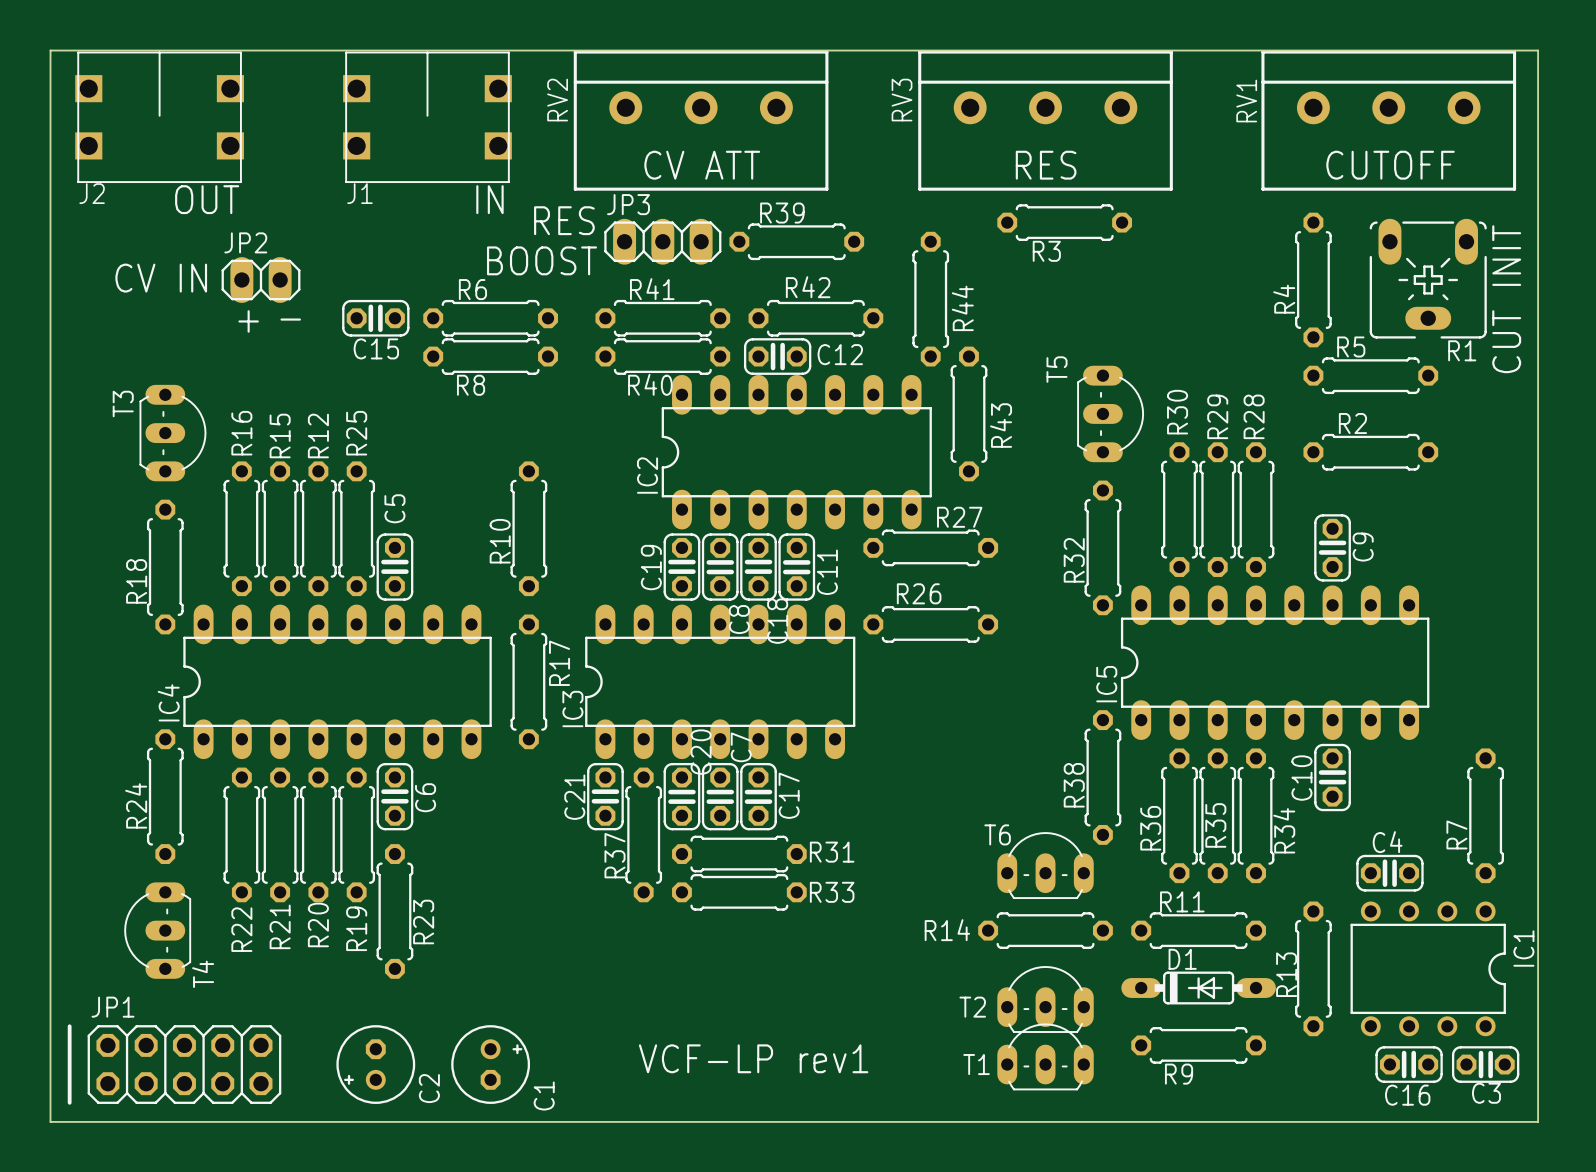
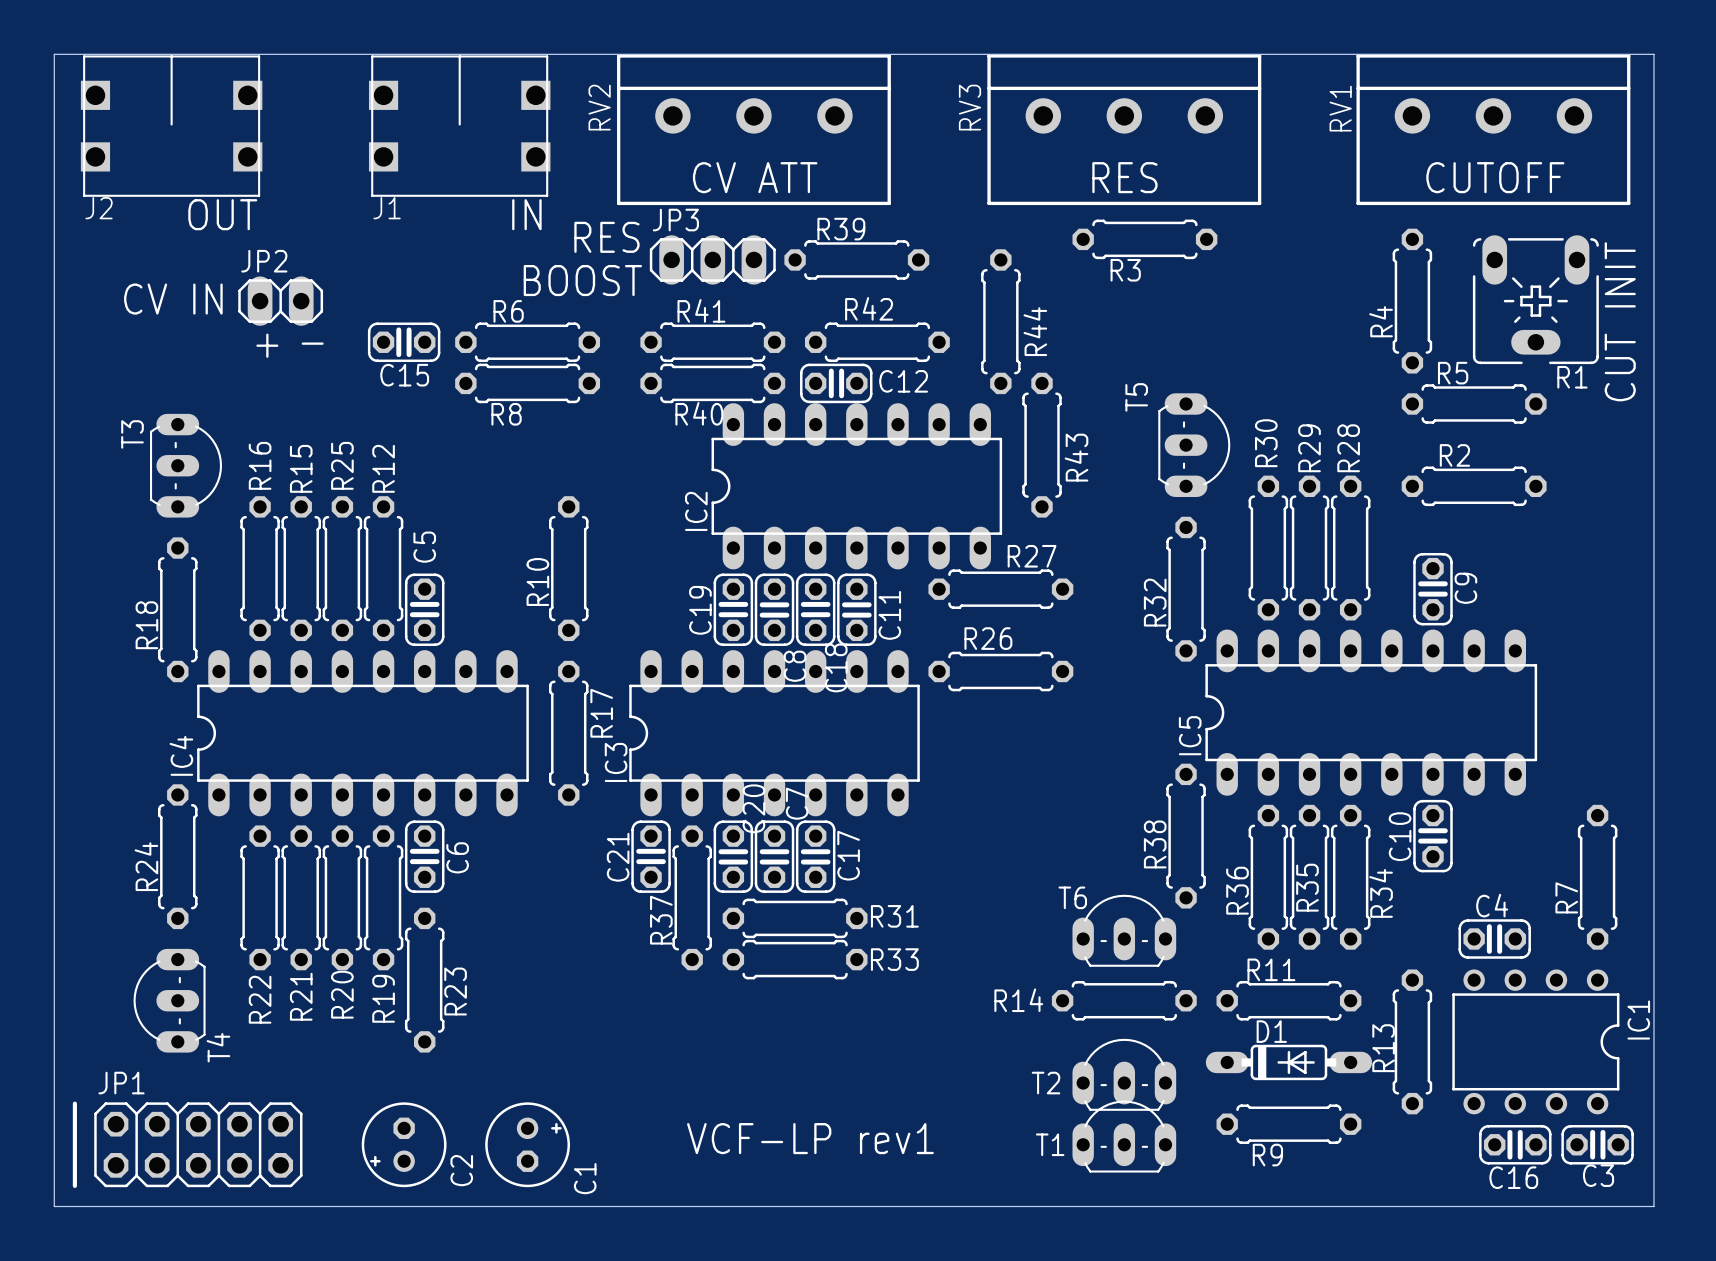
R25 name position: R25 (356, 433) -> R25 (342, 465)
R12 name position: R12 (318, 435) -> R12 (383, 468)

